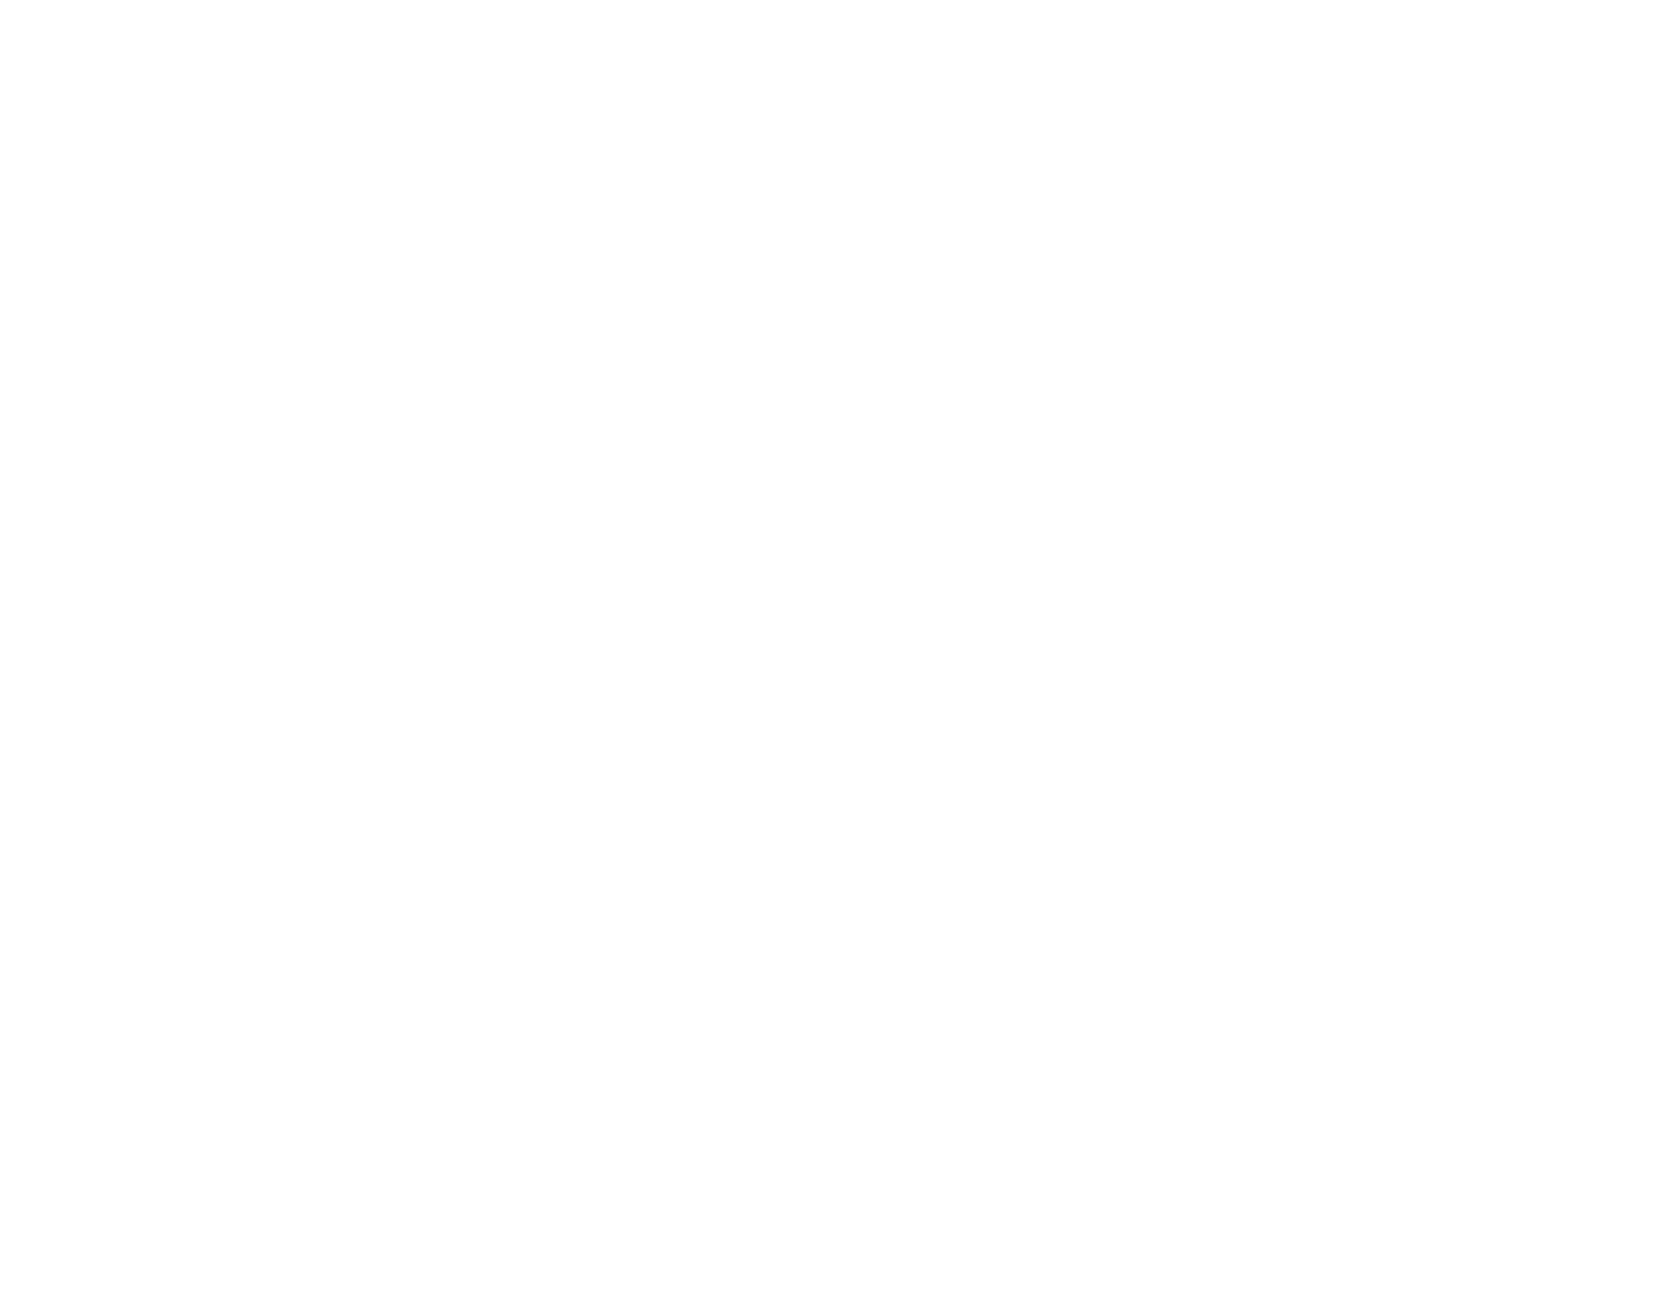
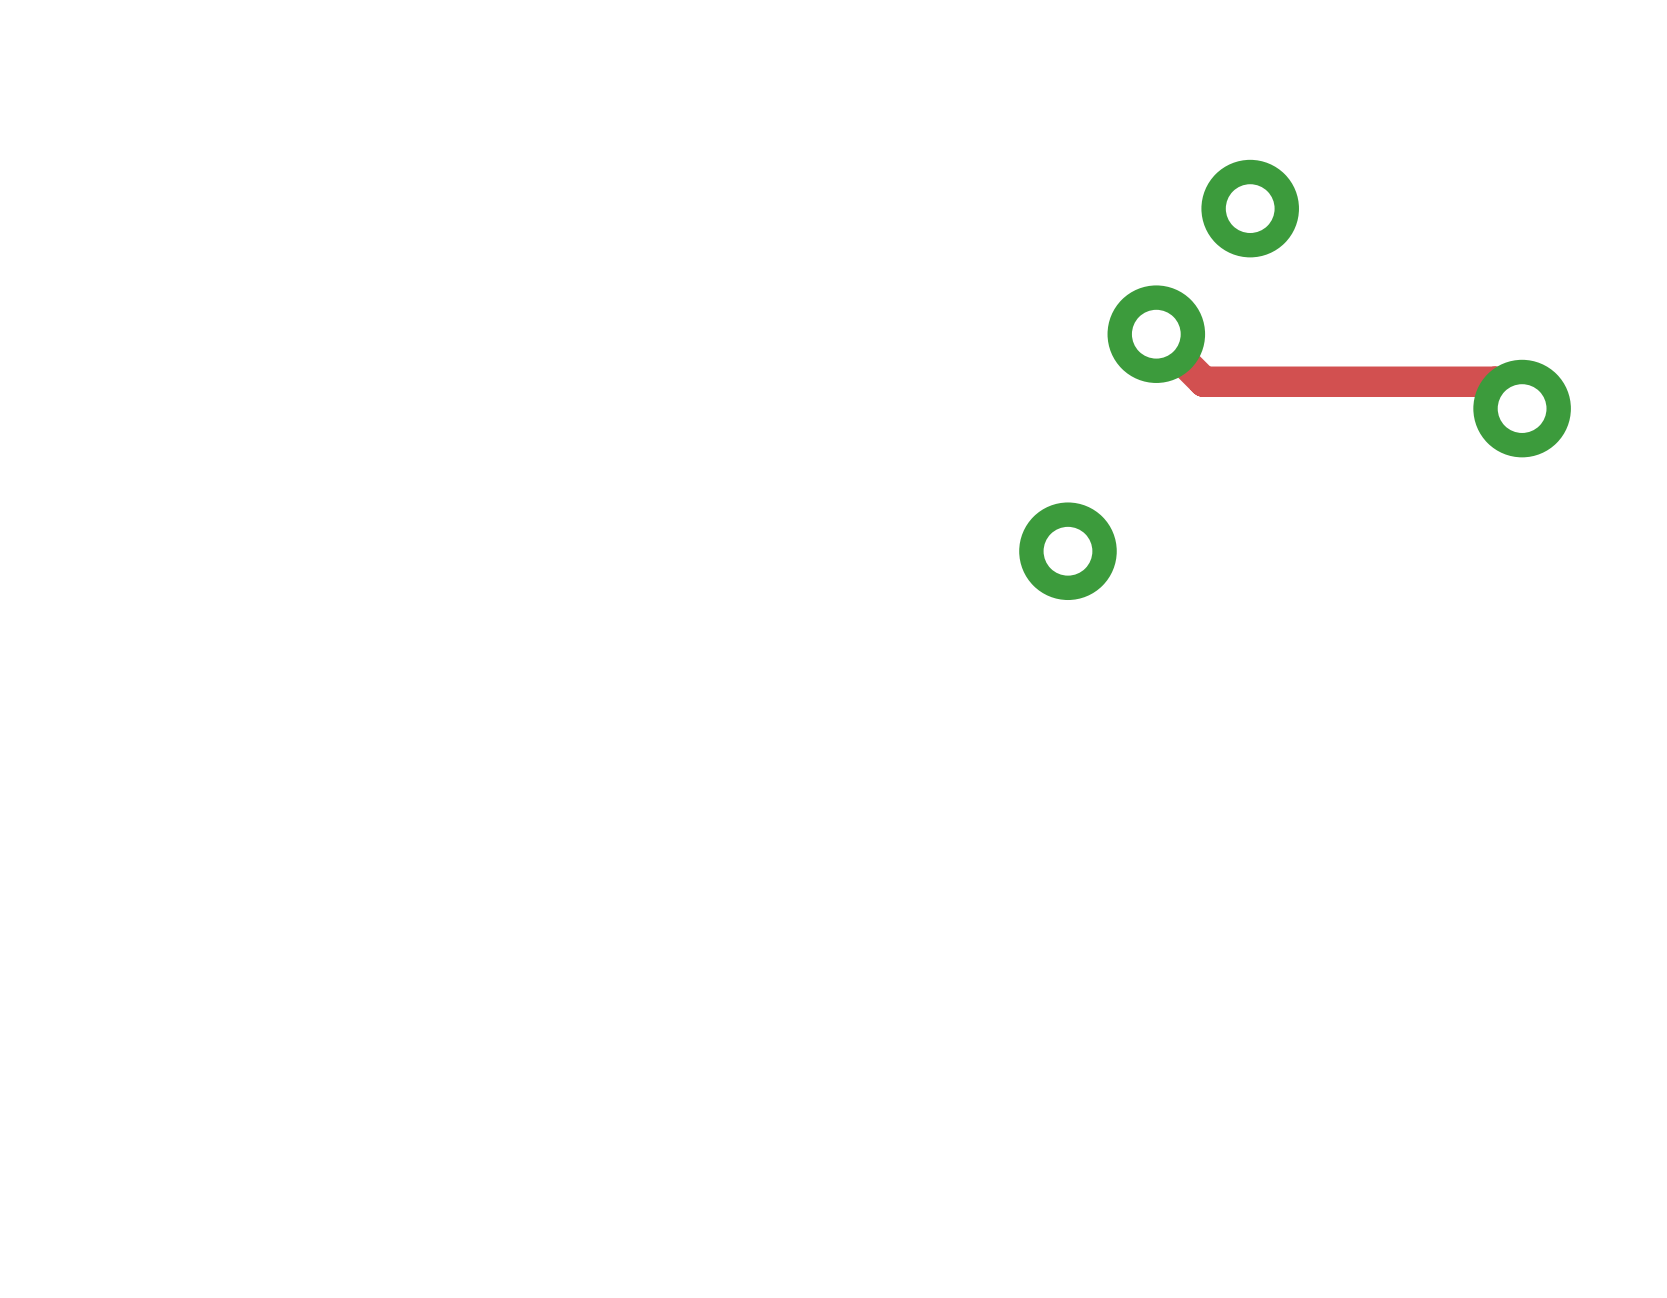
via: none -> (1250, 208)
track: none -> (1156, 334) (1203, 381) (1495, 381) (1522, 408)
via: none -> (1156, 334)
via: none -> (1522, 408)
via: none -> (1067, 551)

